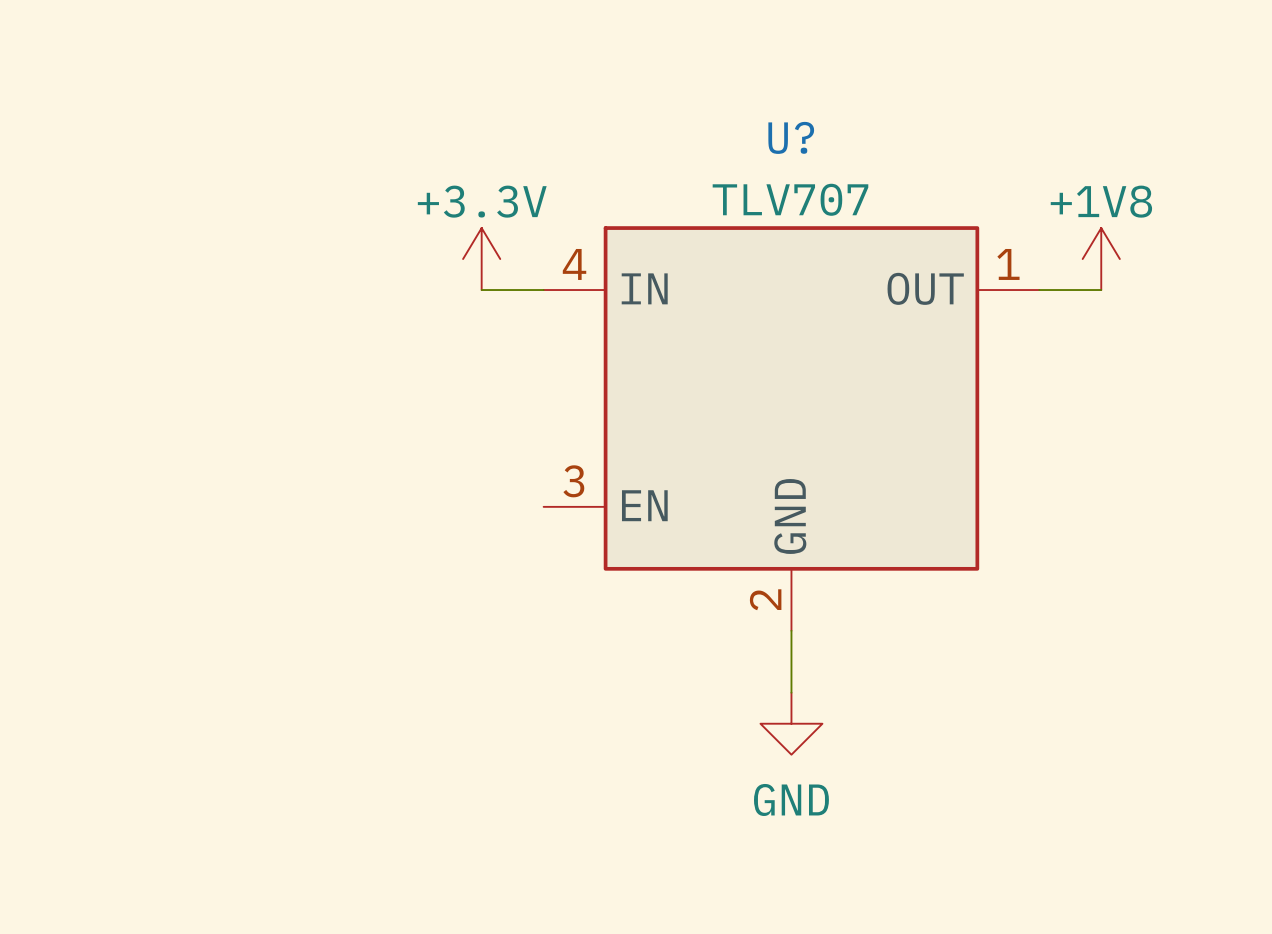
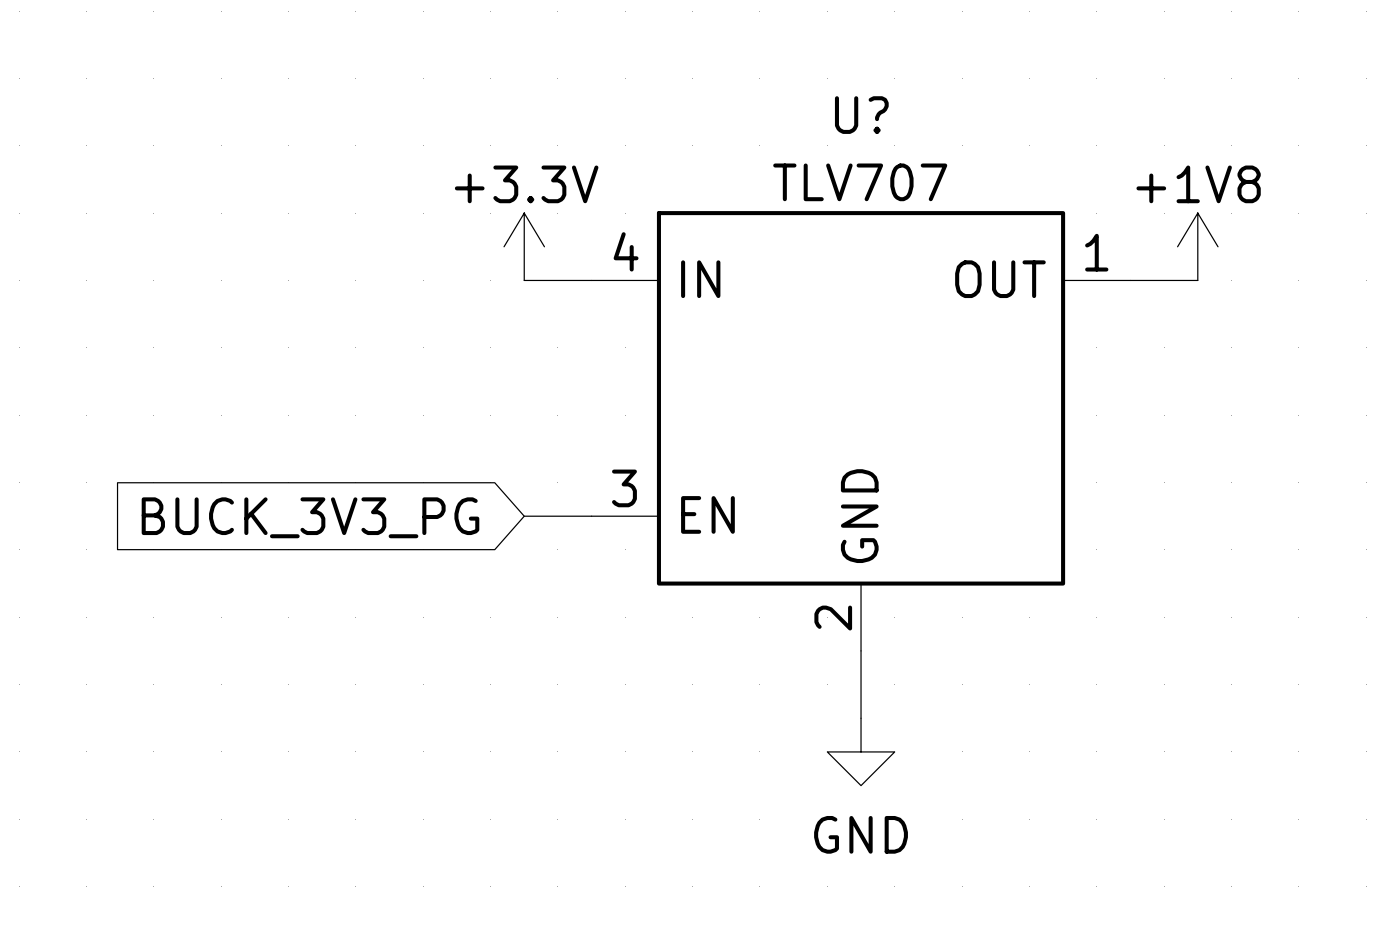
wire: none -> (524, 516) (591, 516)
global label: none -> BUCK_3V3_PG (310, 517)

